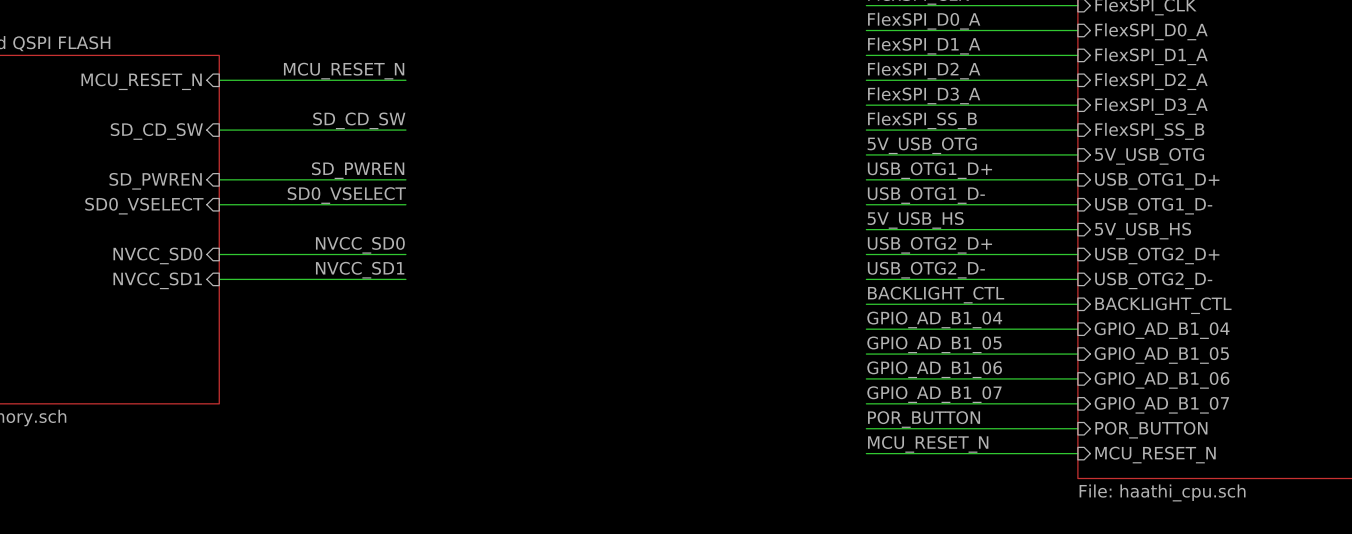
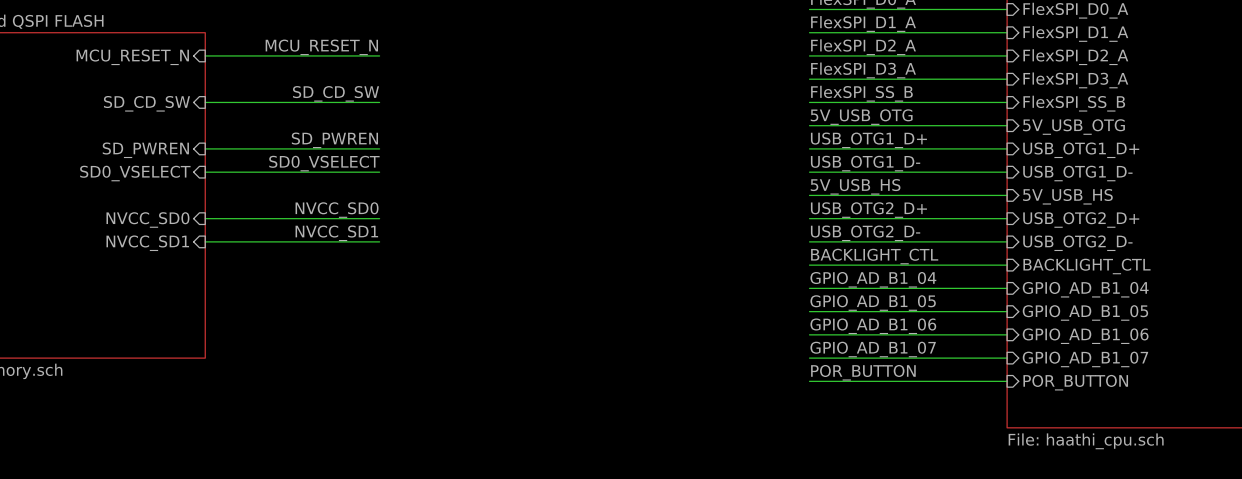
label: MCU_RESET_N (928, 444) -> none
wire: (866, 453) (1077, 453) -> none
sheet pin: MCU_RESET_N (1155, 455) -> none

